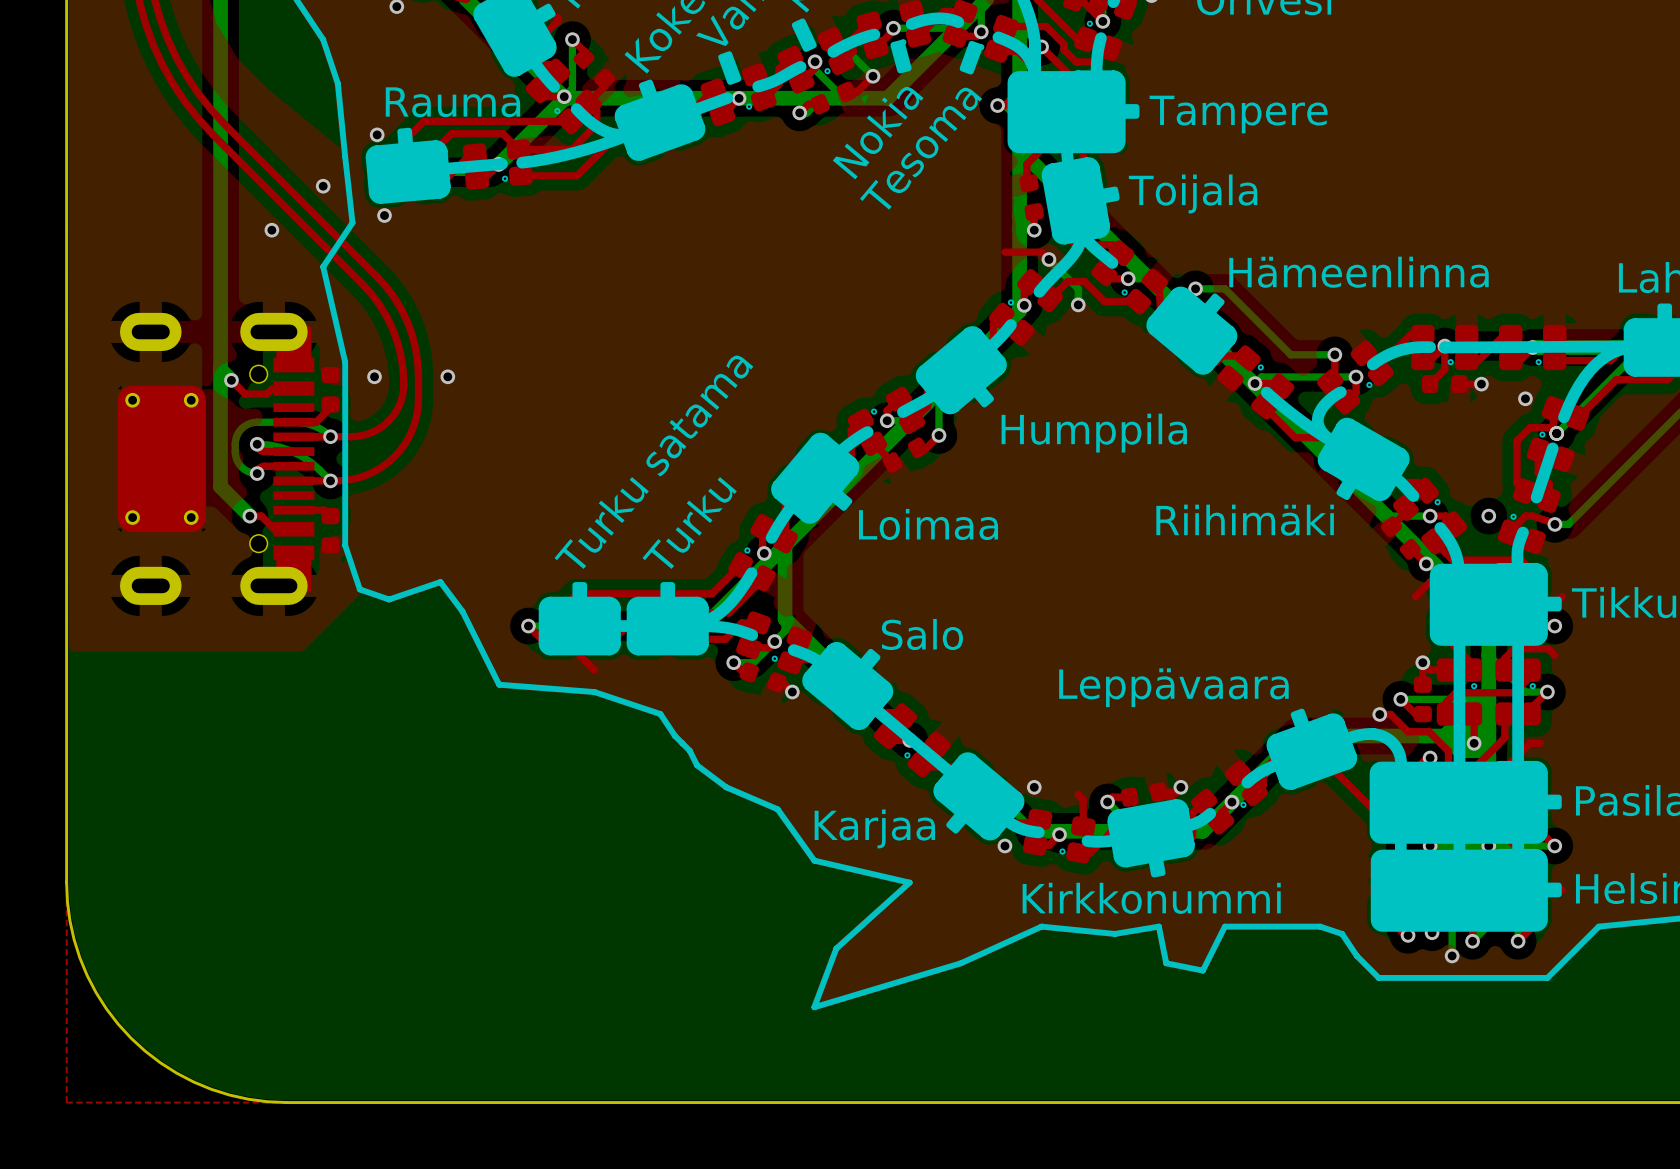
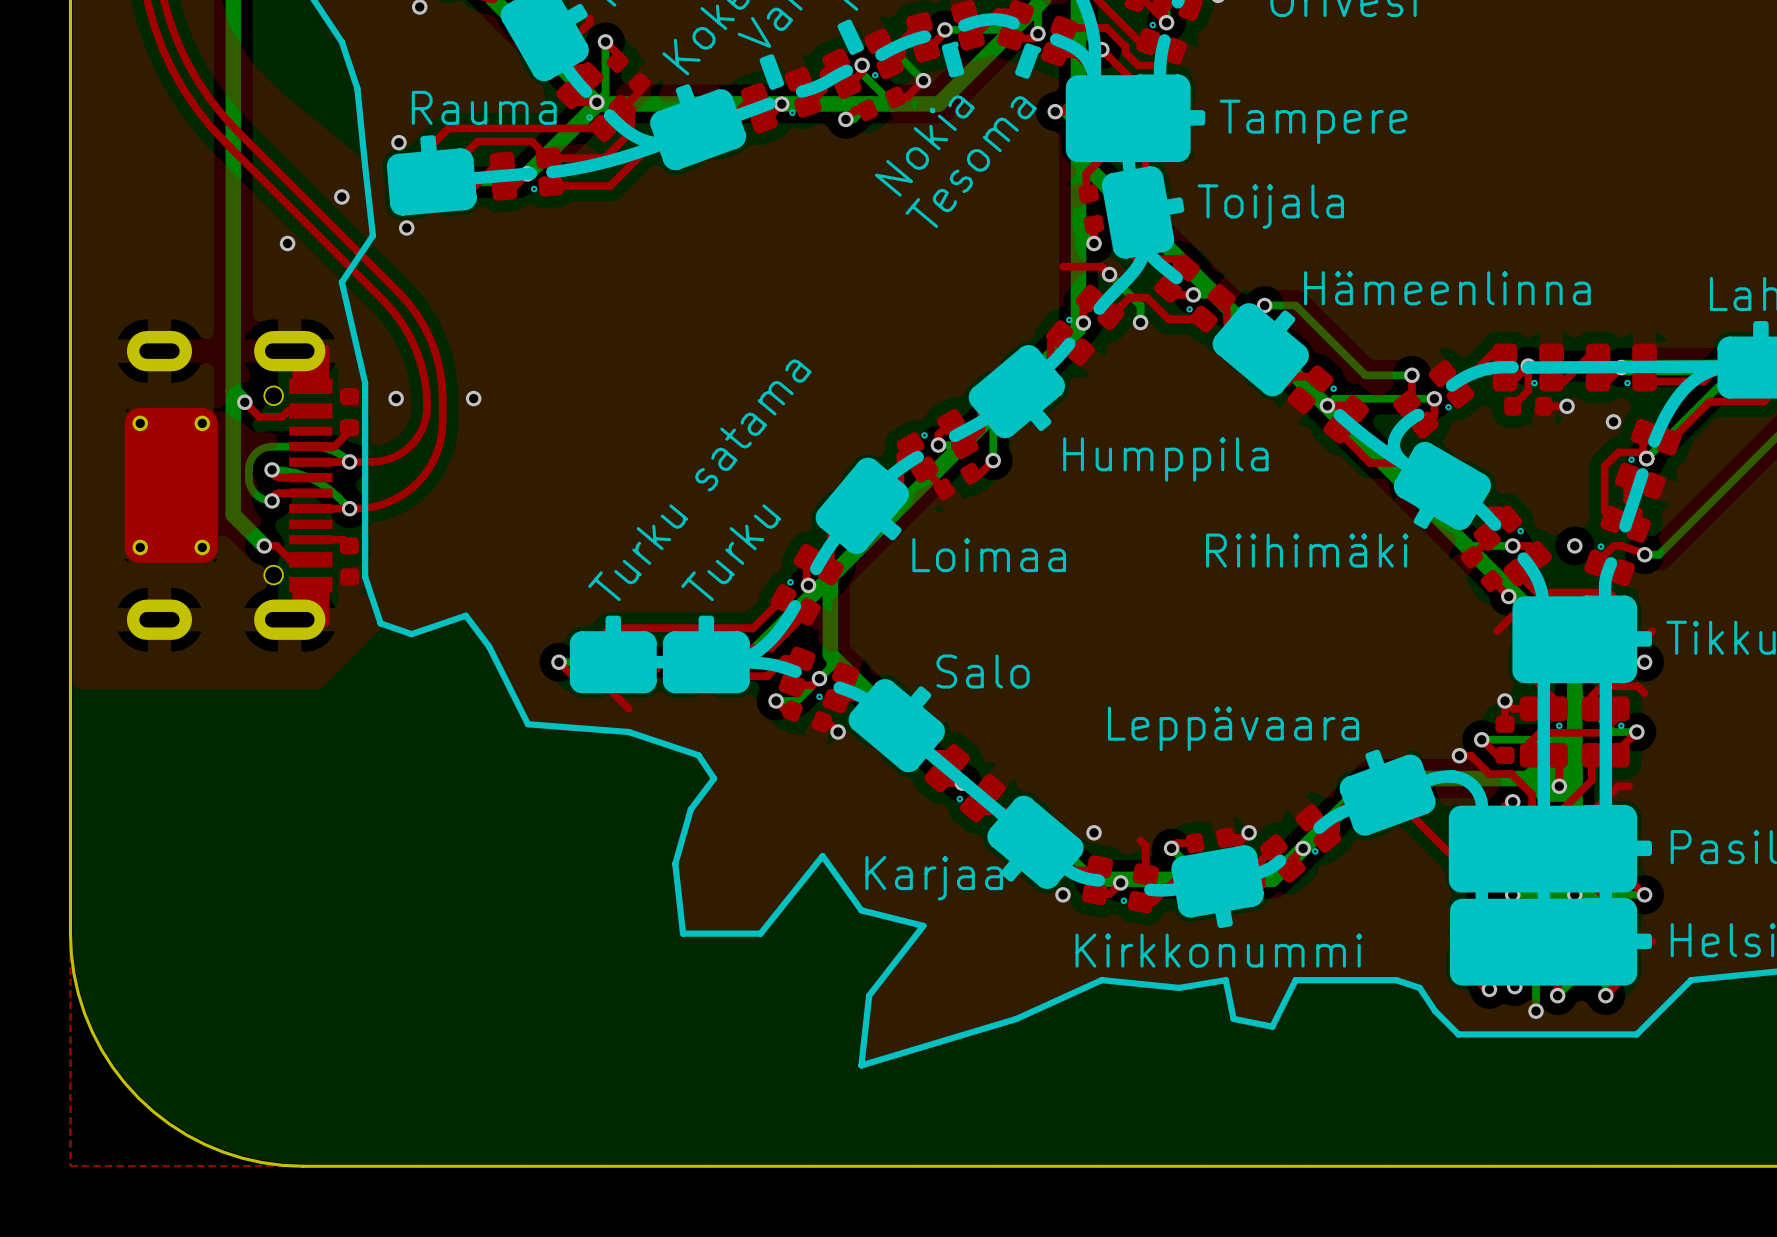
line: (675, 736) (689, 750) (697, 765) (726, 787) (777, 809) -> (714, 778) (690, 809) (675, 863) (683, 933) (760, 933) (822, 856)
line: (814, 860) (909, 882) (836, 948) (814, 1007) -> (861, 910) (923, 925) (869, 995) (861, 1065)

